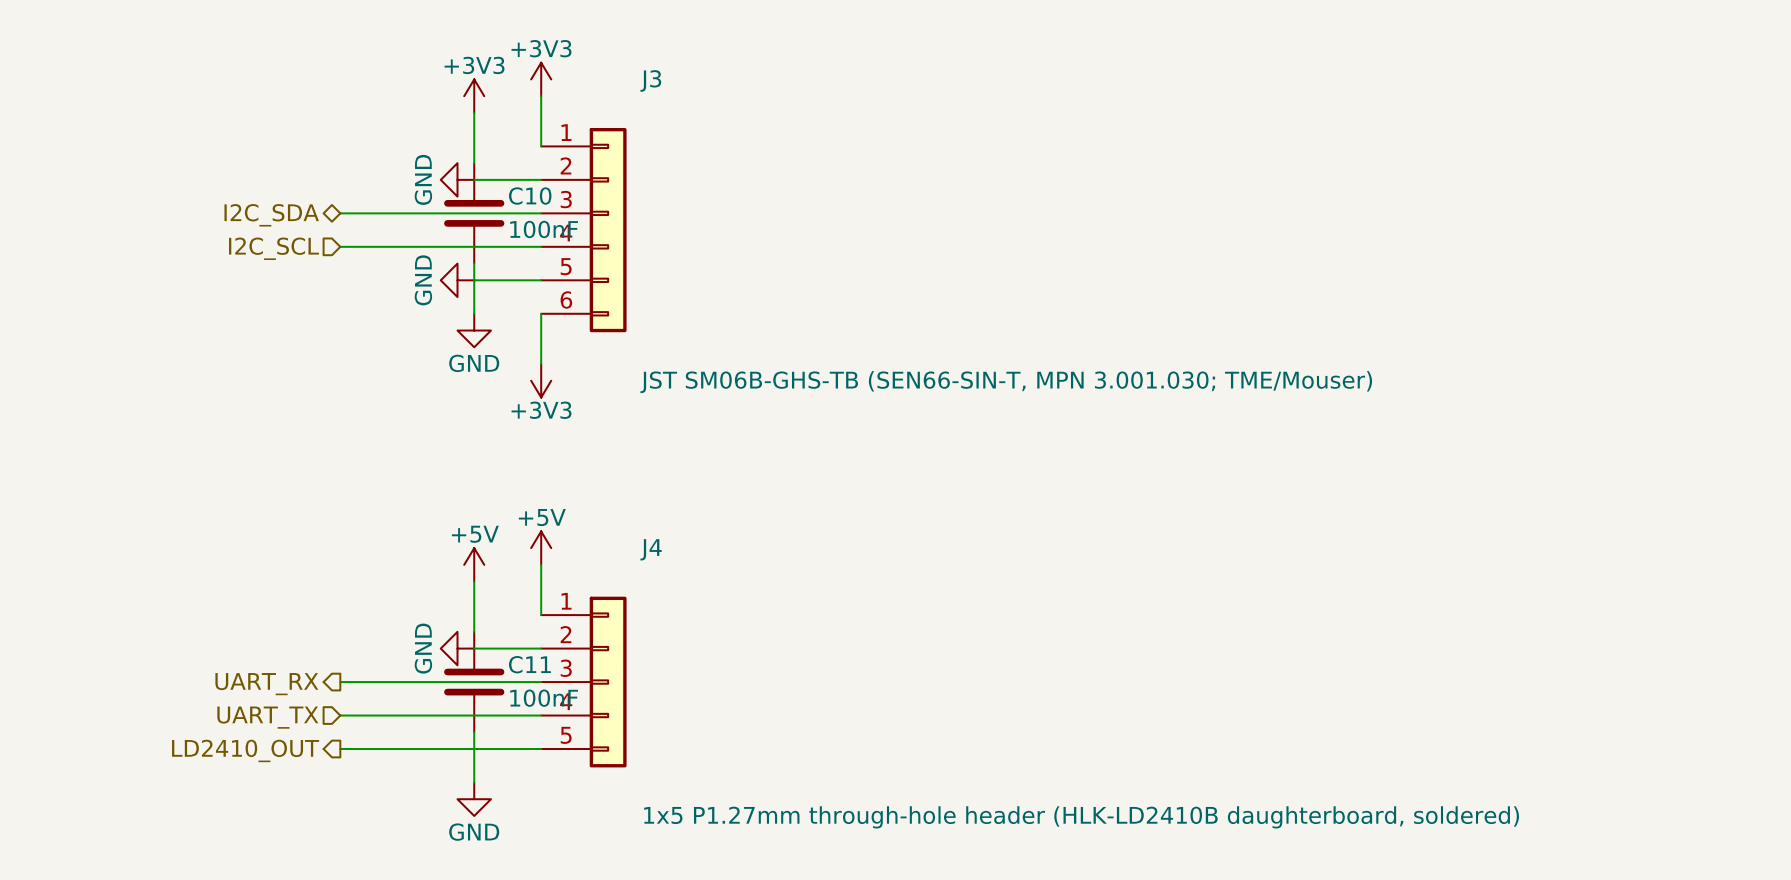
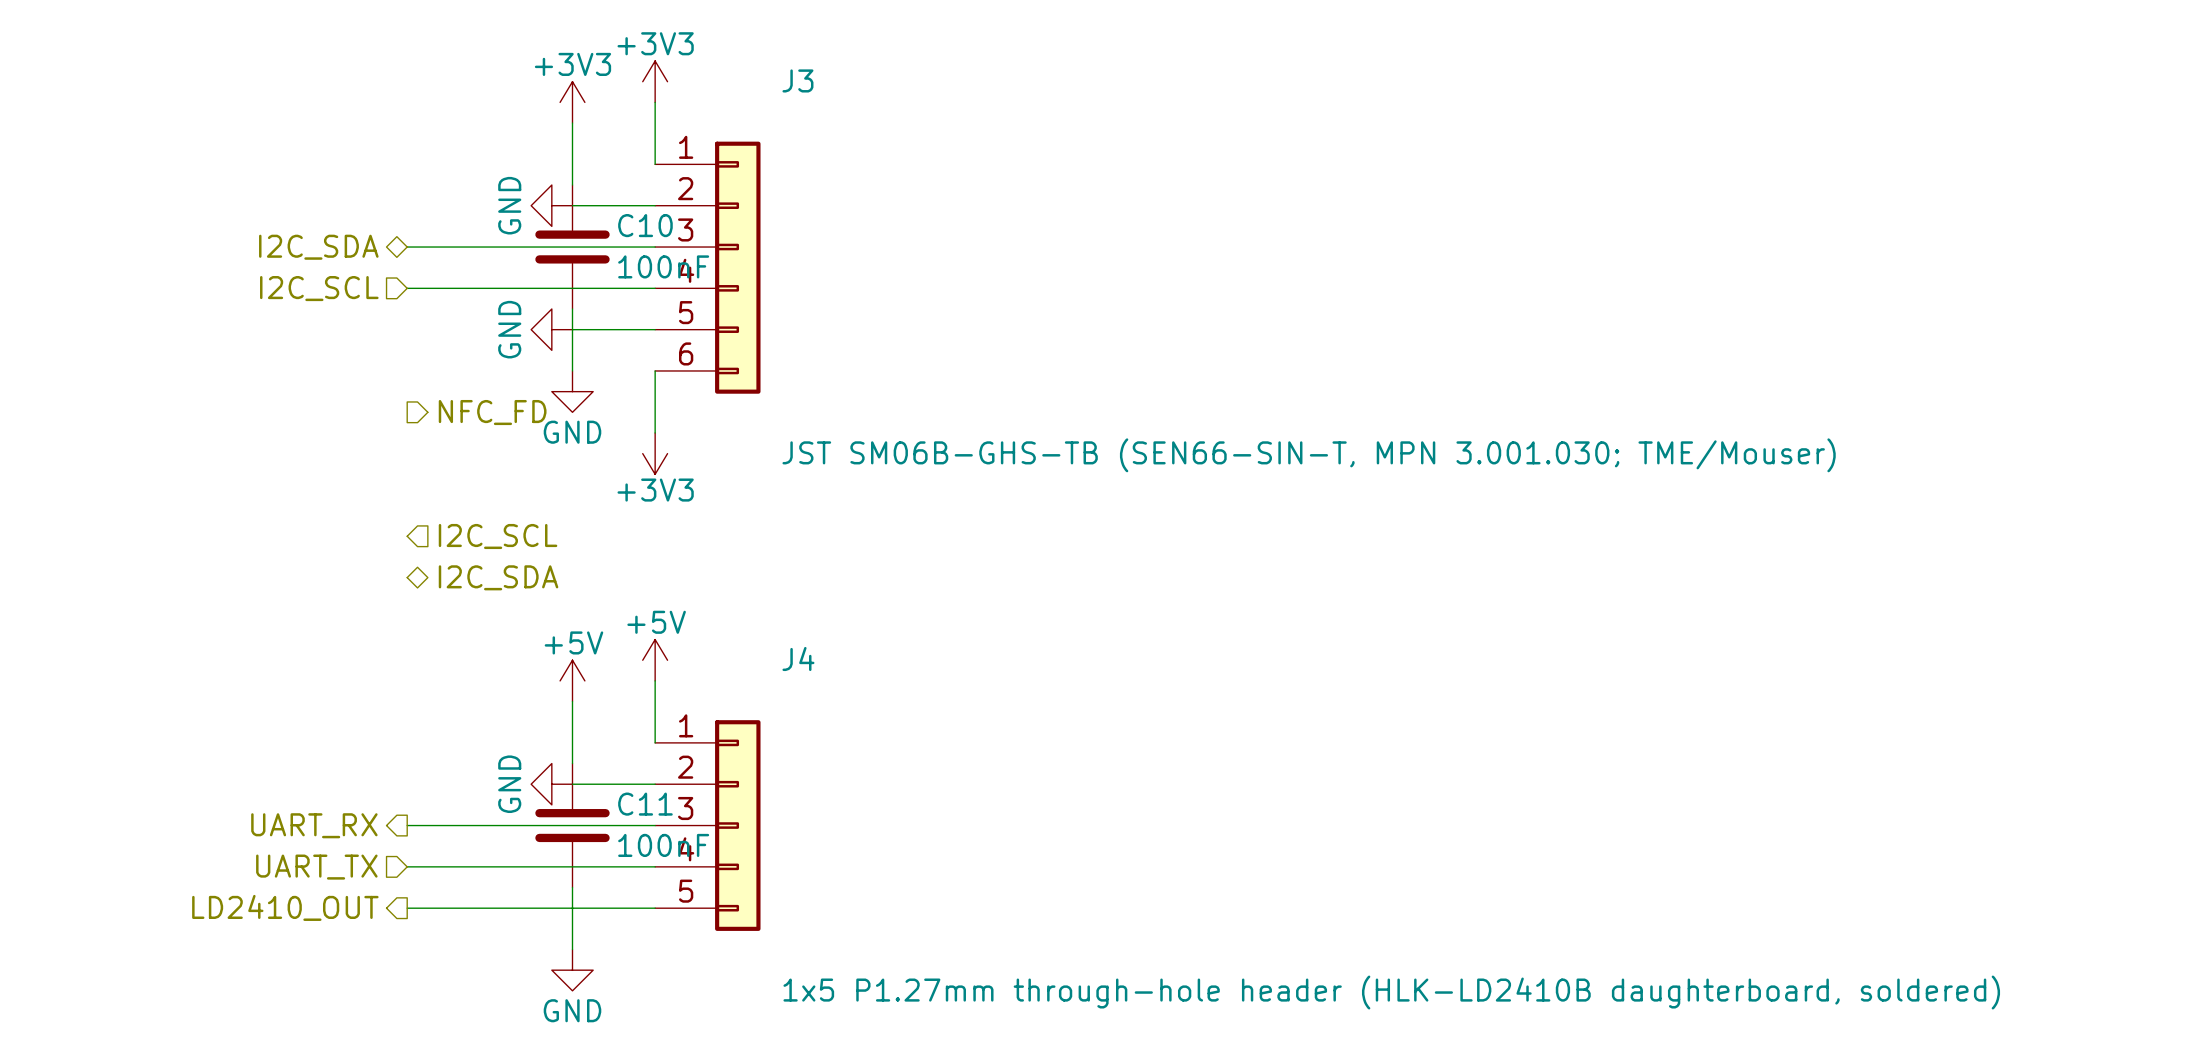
hierarchical label: none -> NFC_FD (492, 412)
hierarchical label: none -> I2C_SCL (498, 536)
hierarchical label: none -> I2C_SDA (498, 577)

